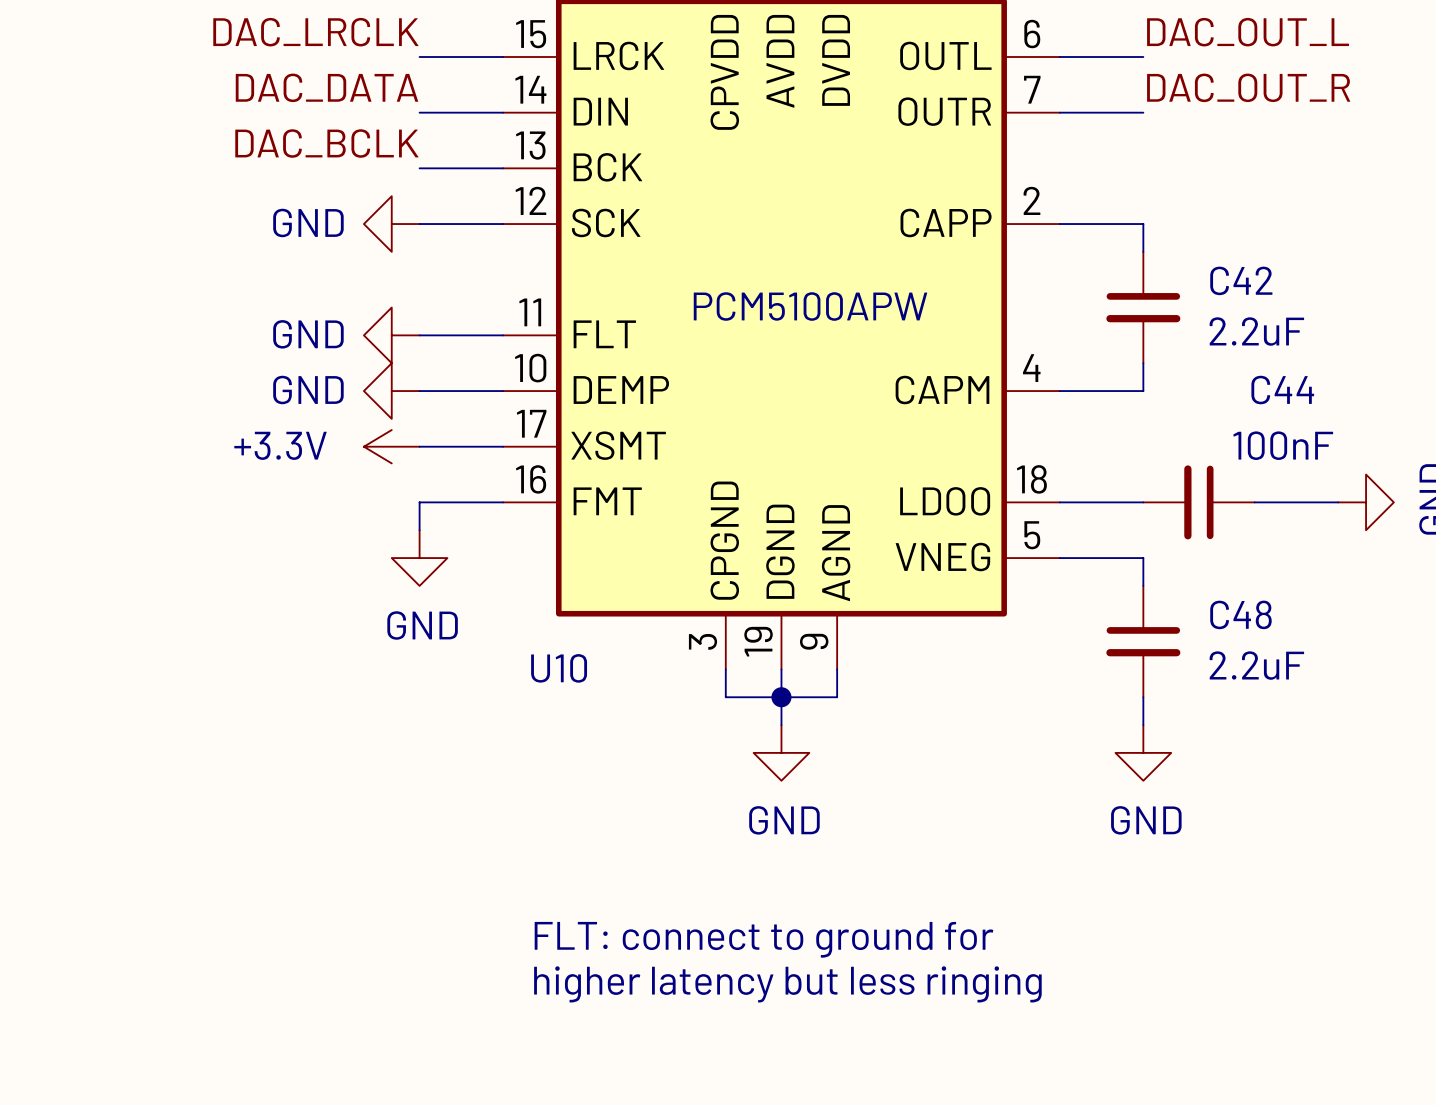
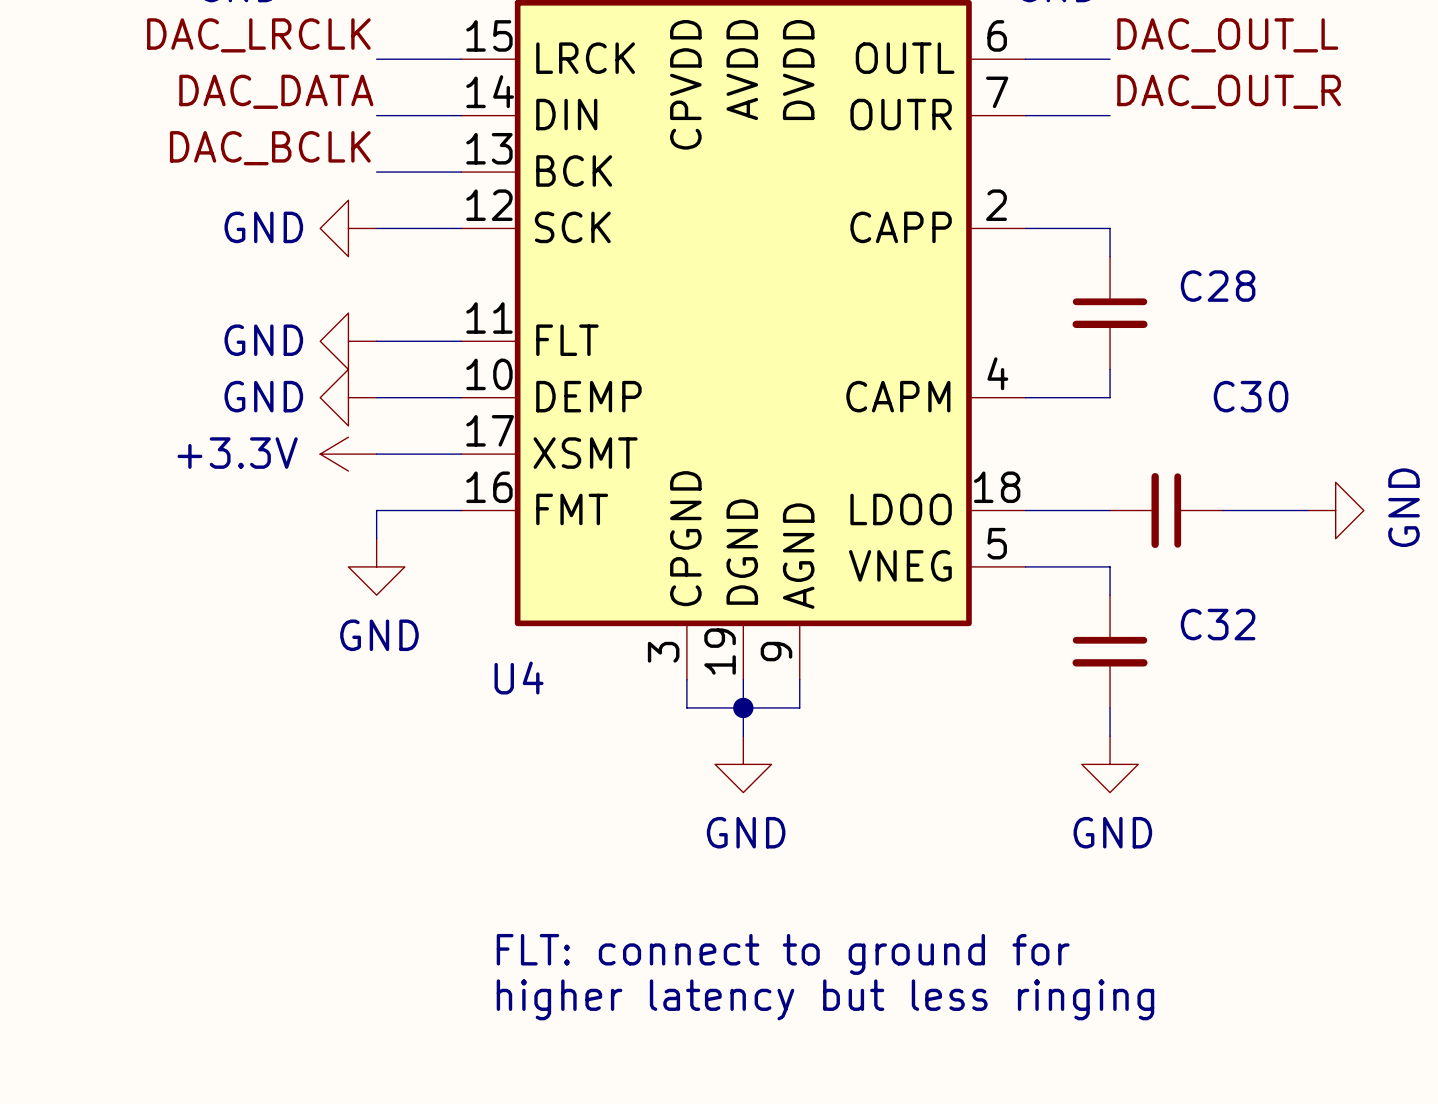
C42 name: C42 (1241, 280) -> C28 (1218, 286)
U10 value: PCM5100APW (810, 306) -> none
C42 value: 2.2uF (1256, 331) -> none
C44 name: C44 (1282, 390) -> C30 (1251, 396)
C44 value: 100nF (1283, 445) -> none
C48 name: C48 (1240, 614) -> C32 (1218, 624)
C48 value: 2.2uF (1256, 665) -> none
U10 name: U10 (559, 668) -> U4 (519, 678)

